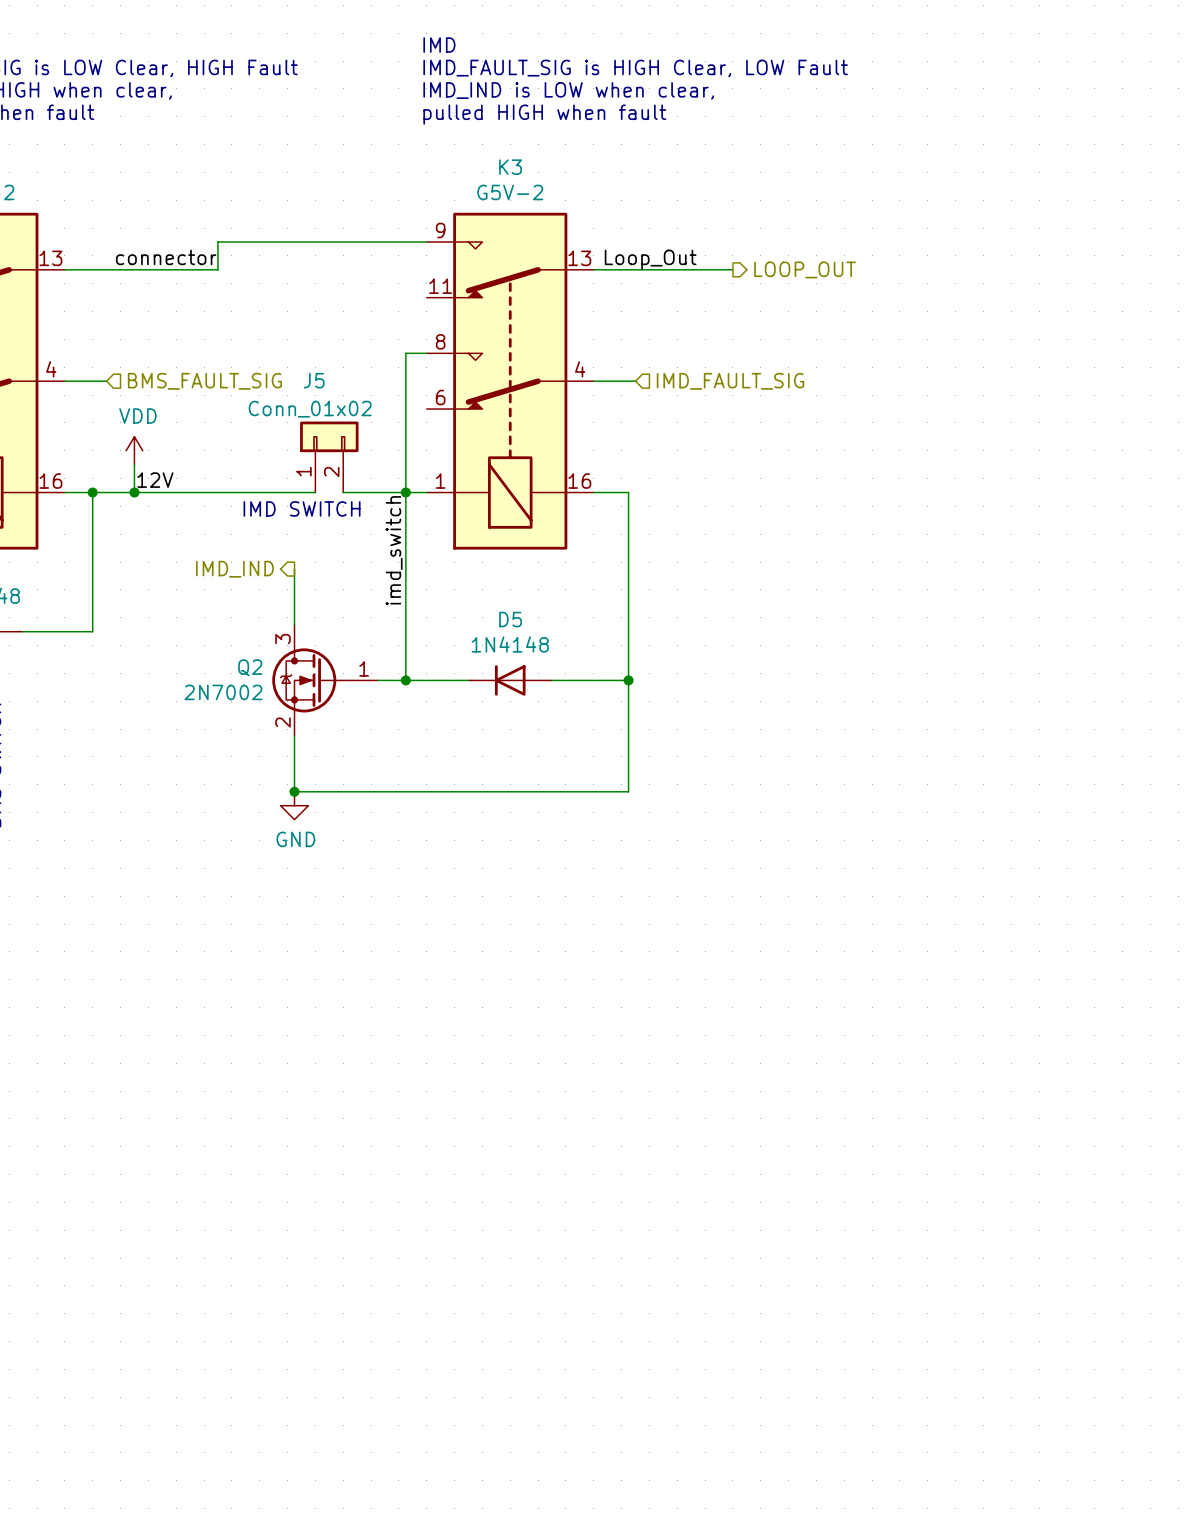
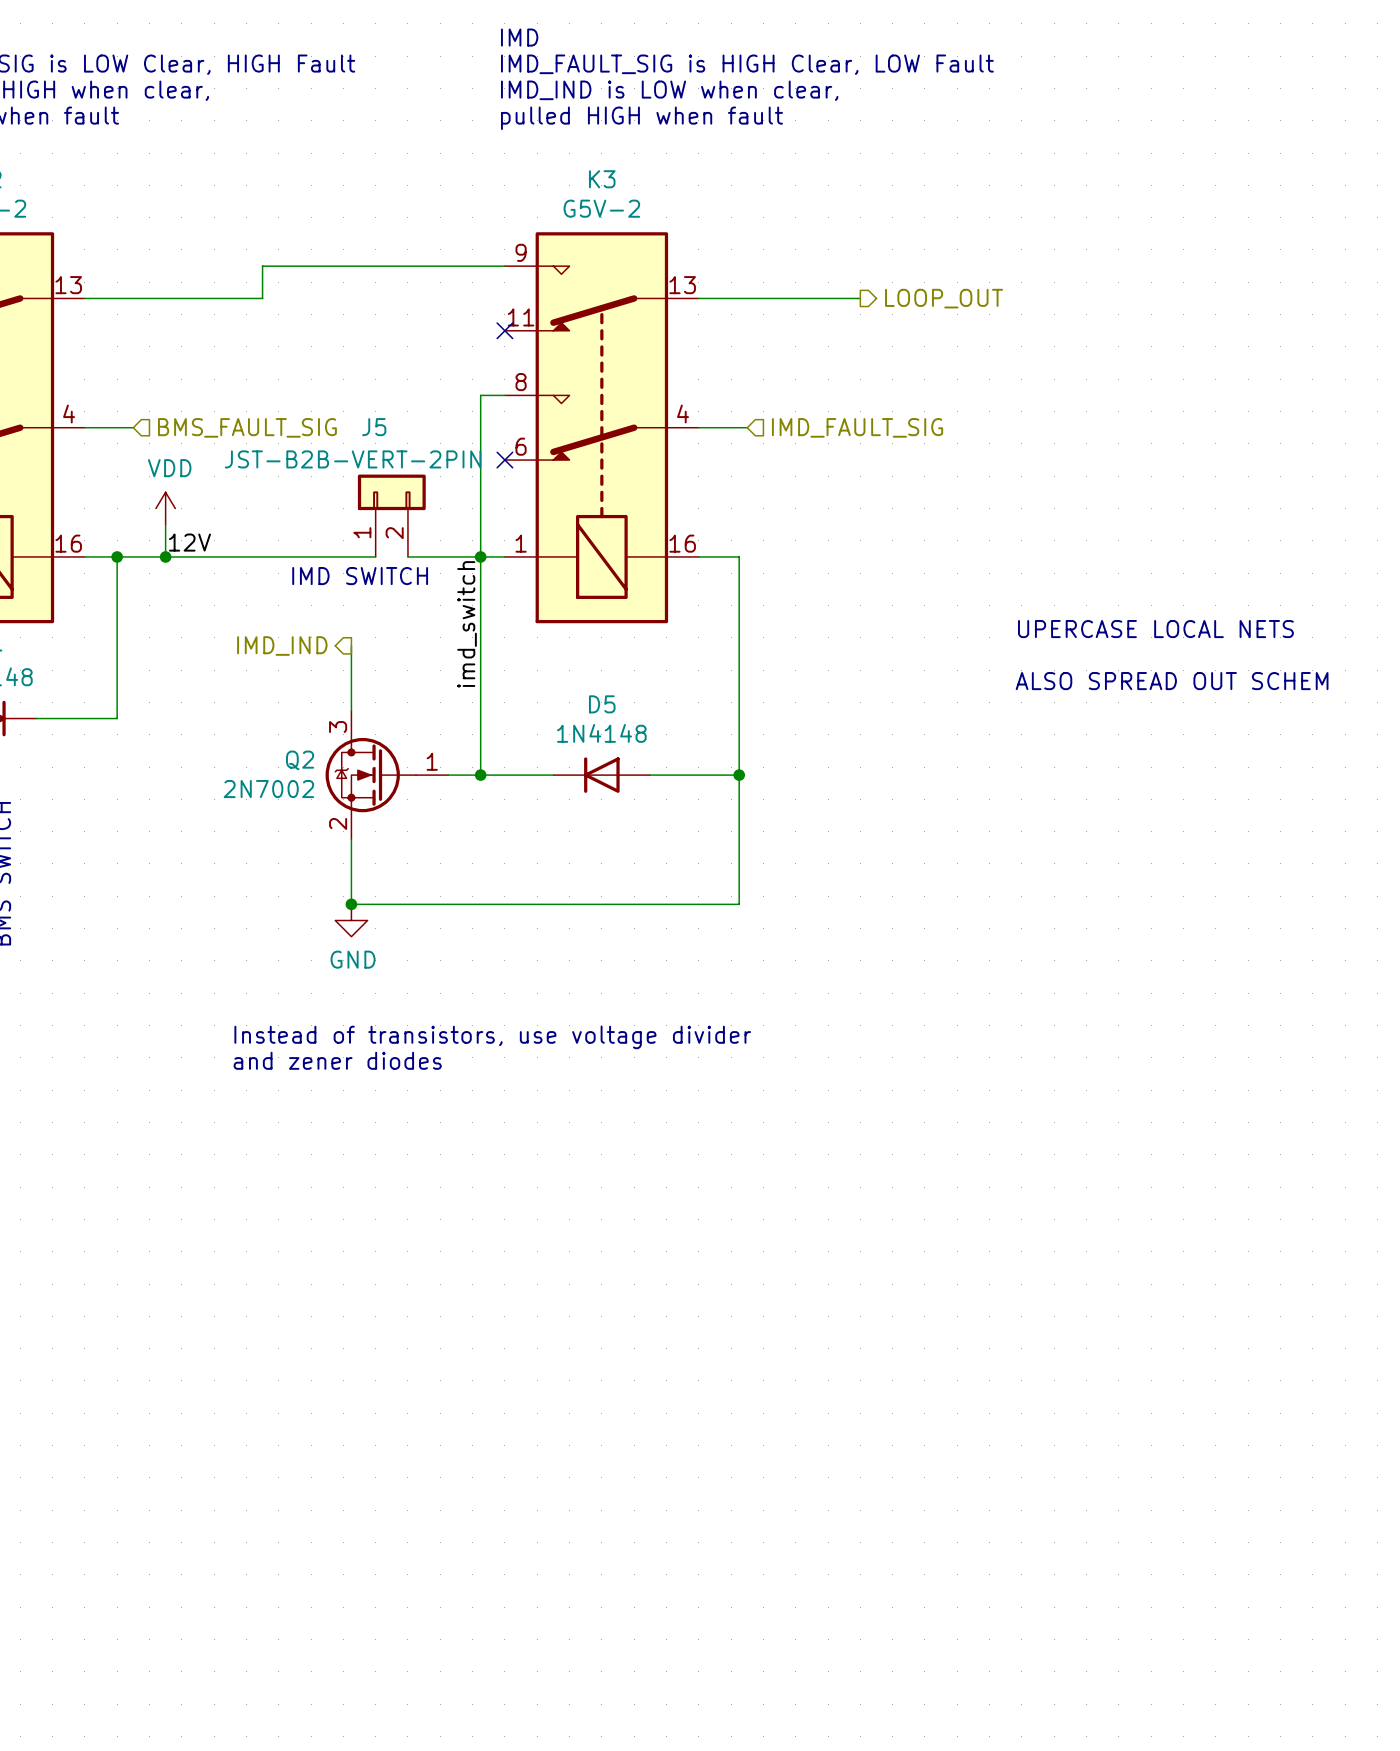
label: connector (166, 257) -> none
label: Loop_Out (650, 259) -> none
no-connect mark: none -> (504, 330)
J5 value: Conn_01x02 (310, 409) -> JST-B2B-VERT-2PIN (353, 459)
no-connect mark: none -> (504, 460)
text: none -> UPERCASE LOCAL NETS (1155, 629)
text: none -> ALSO SPREAD OUT SCHEM (1172, 681)
text: none -> Instead of transistors, use voltage divider (492, 1037)
text: none -> and zener diodes (337, 1060)

